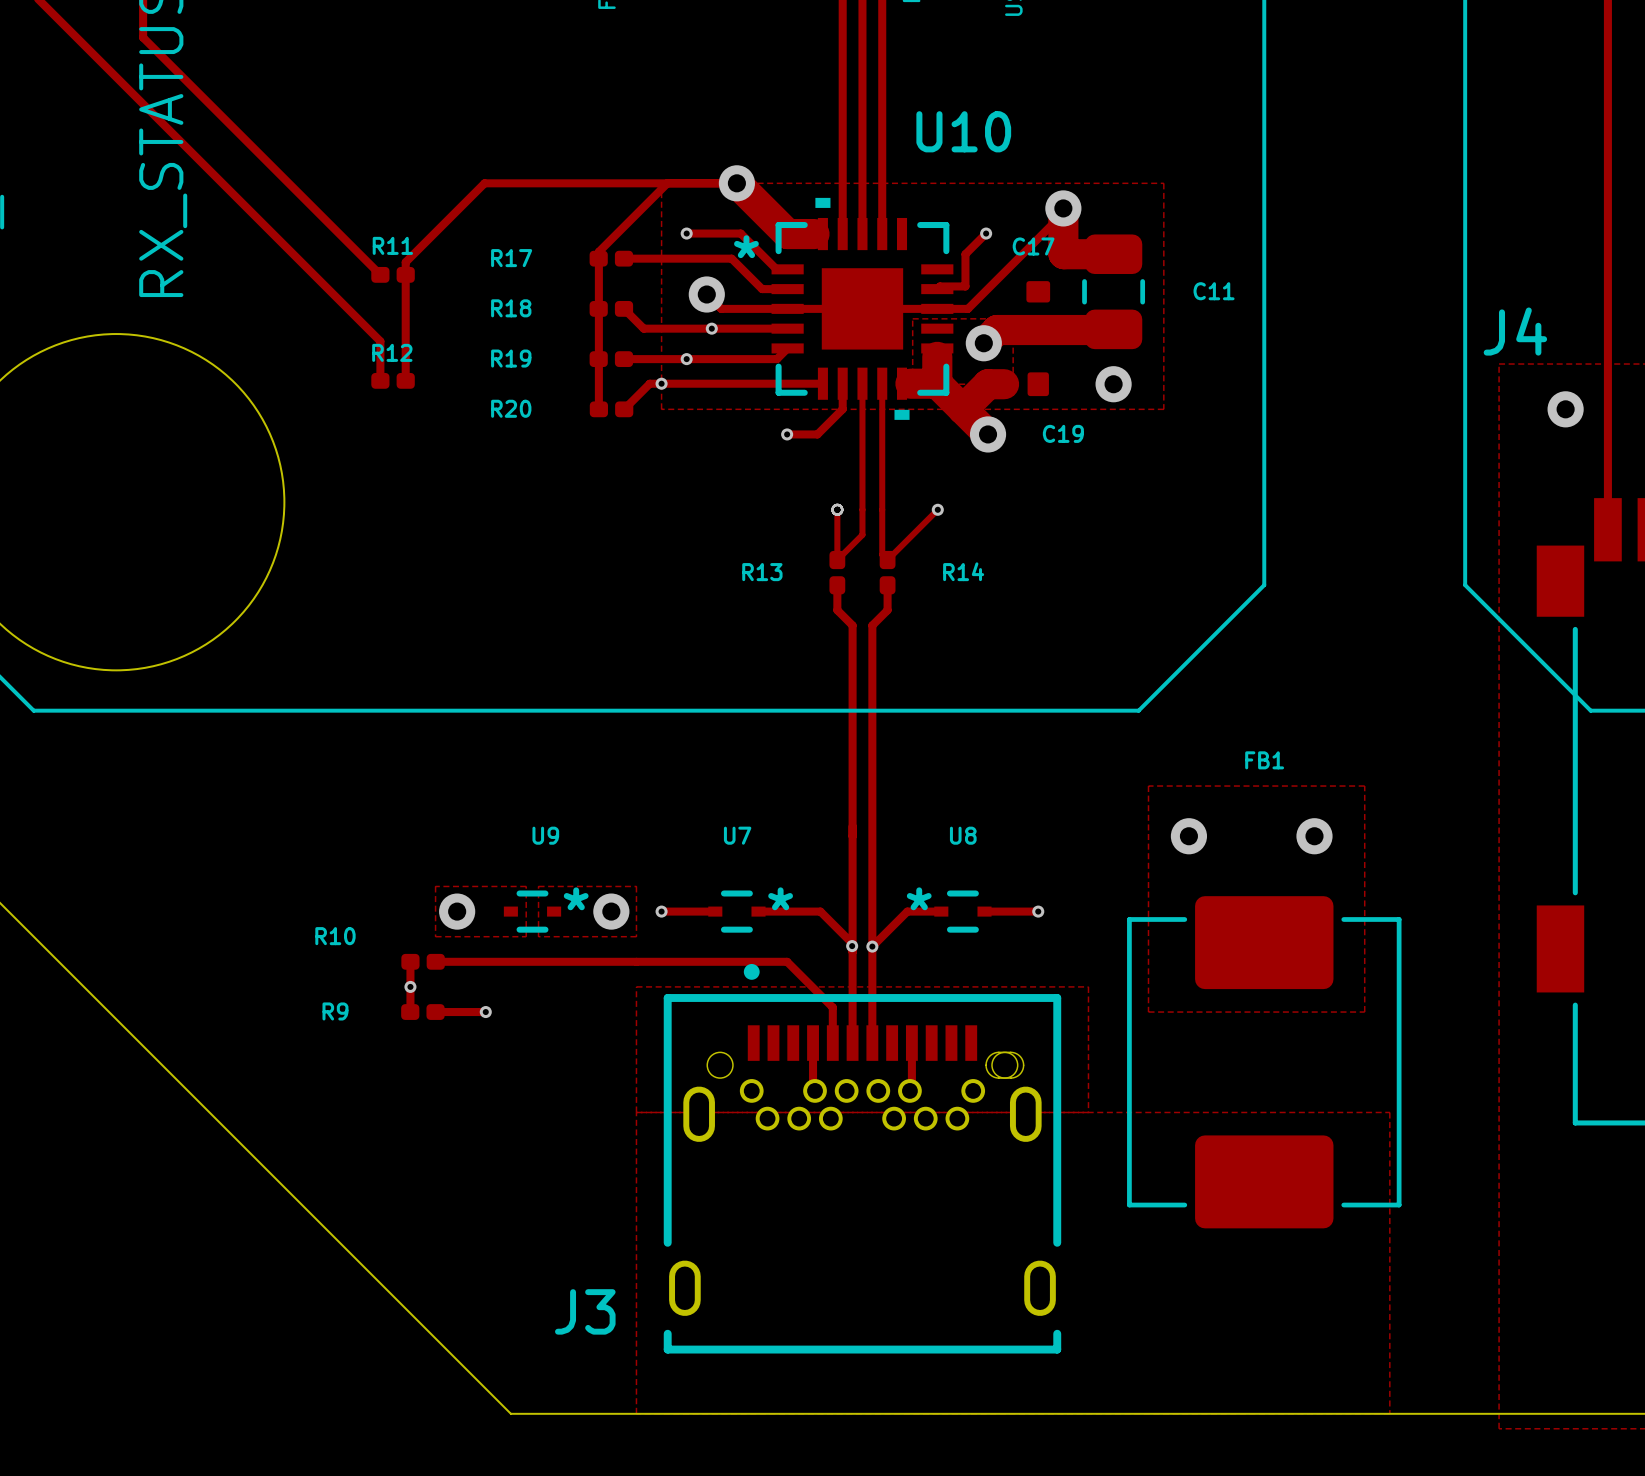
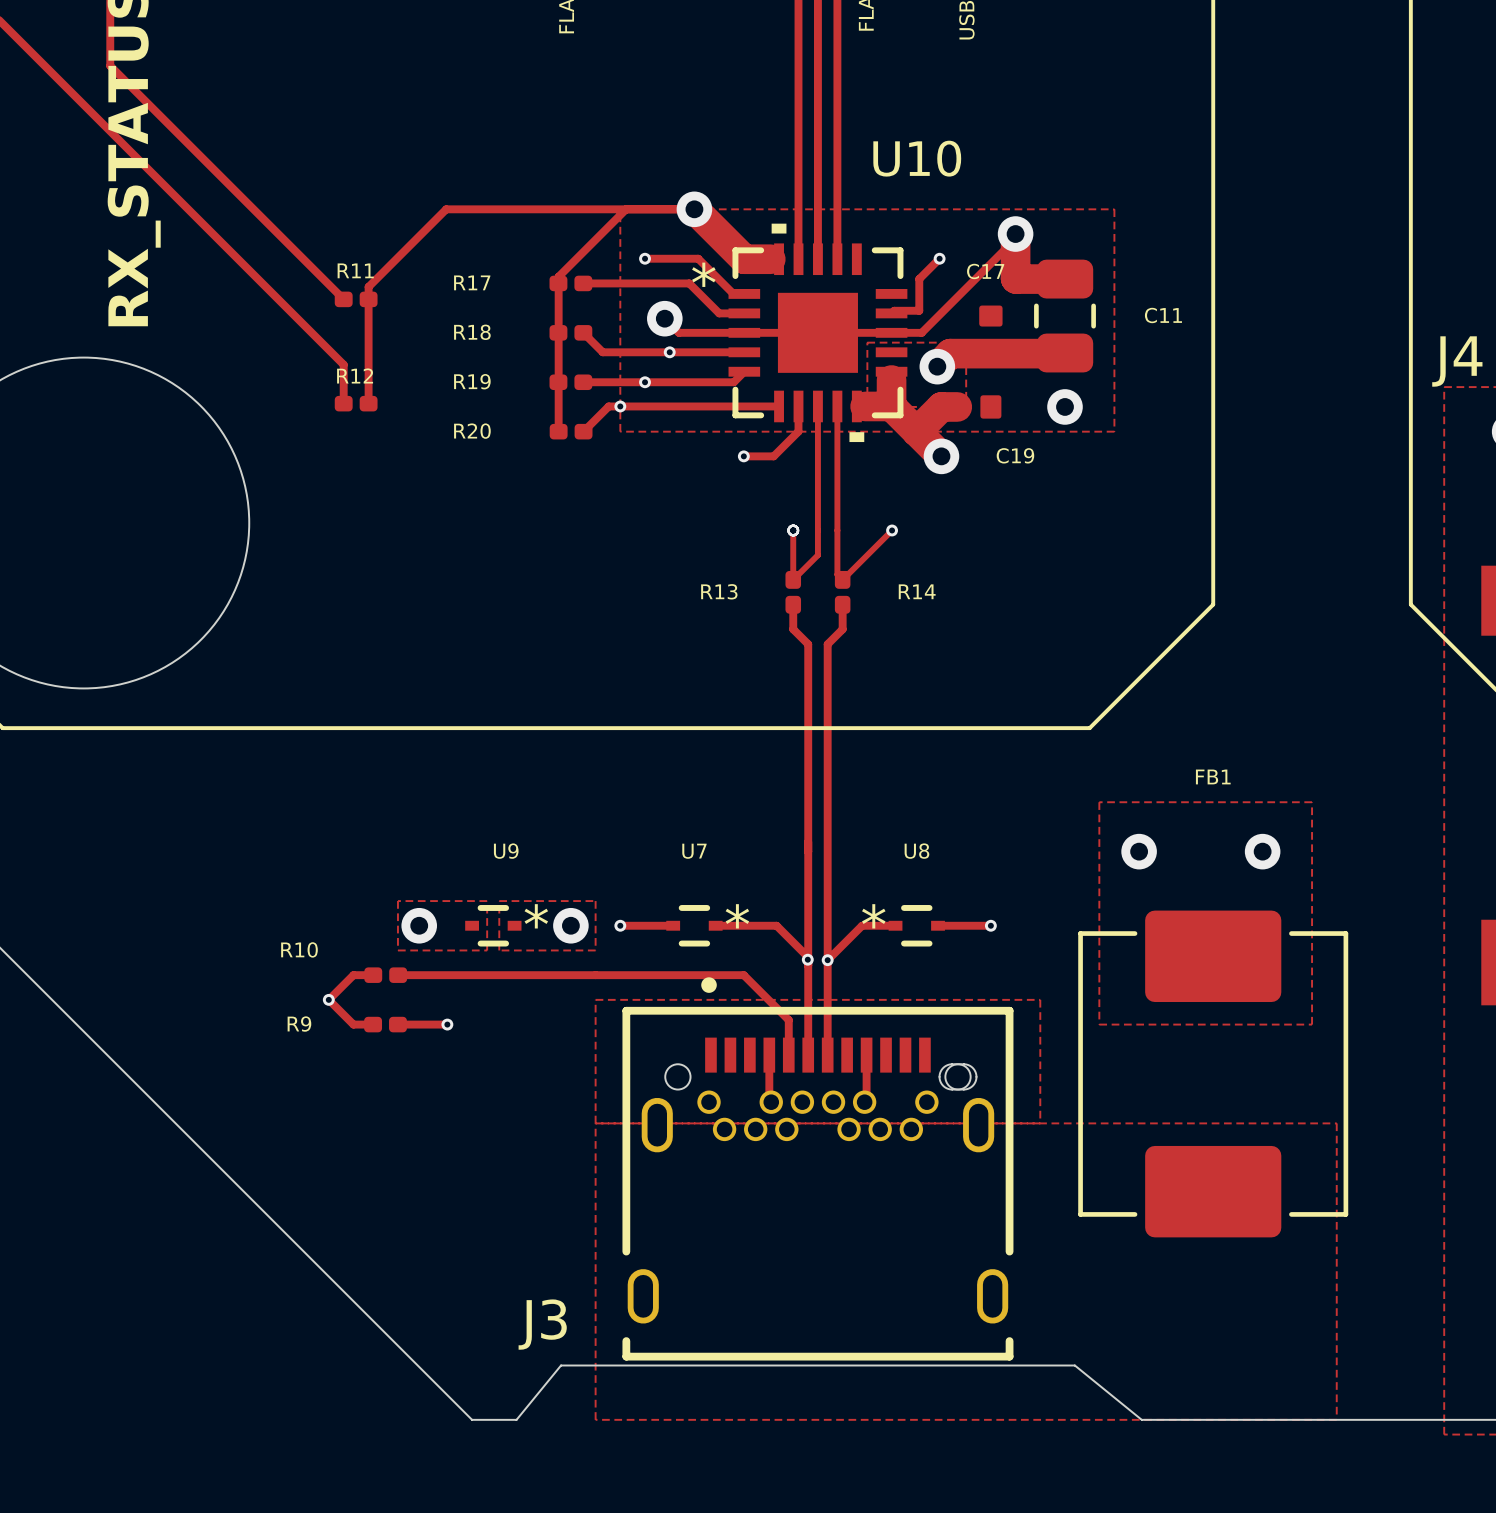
track: (410, 961) (410, 1011) -> (373, 975) (353, 975) (328, 999) (353, 1024) (373, 1024)
via position: (410, 986) -> (328, 999)
board edge: (556, 1413) (1191, 1413) -> (516, 1419) (561, 1365) (1074, 1365) (1141, 1419)

